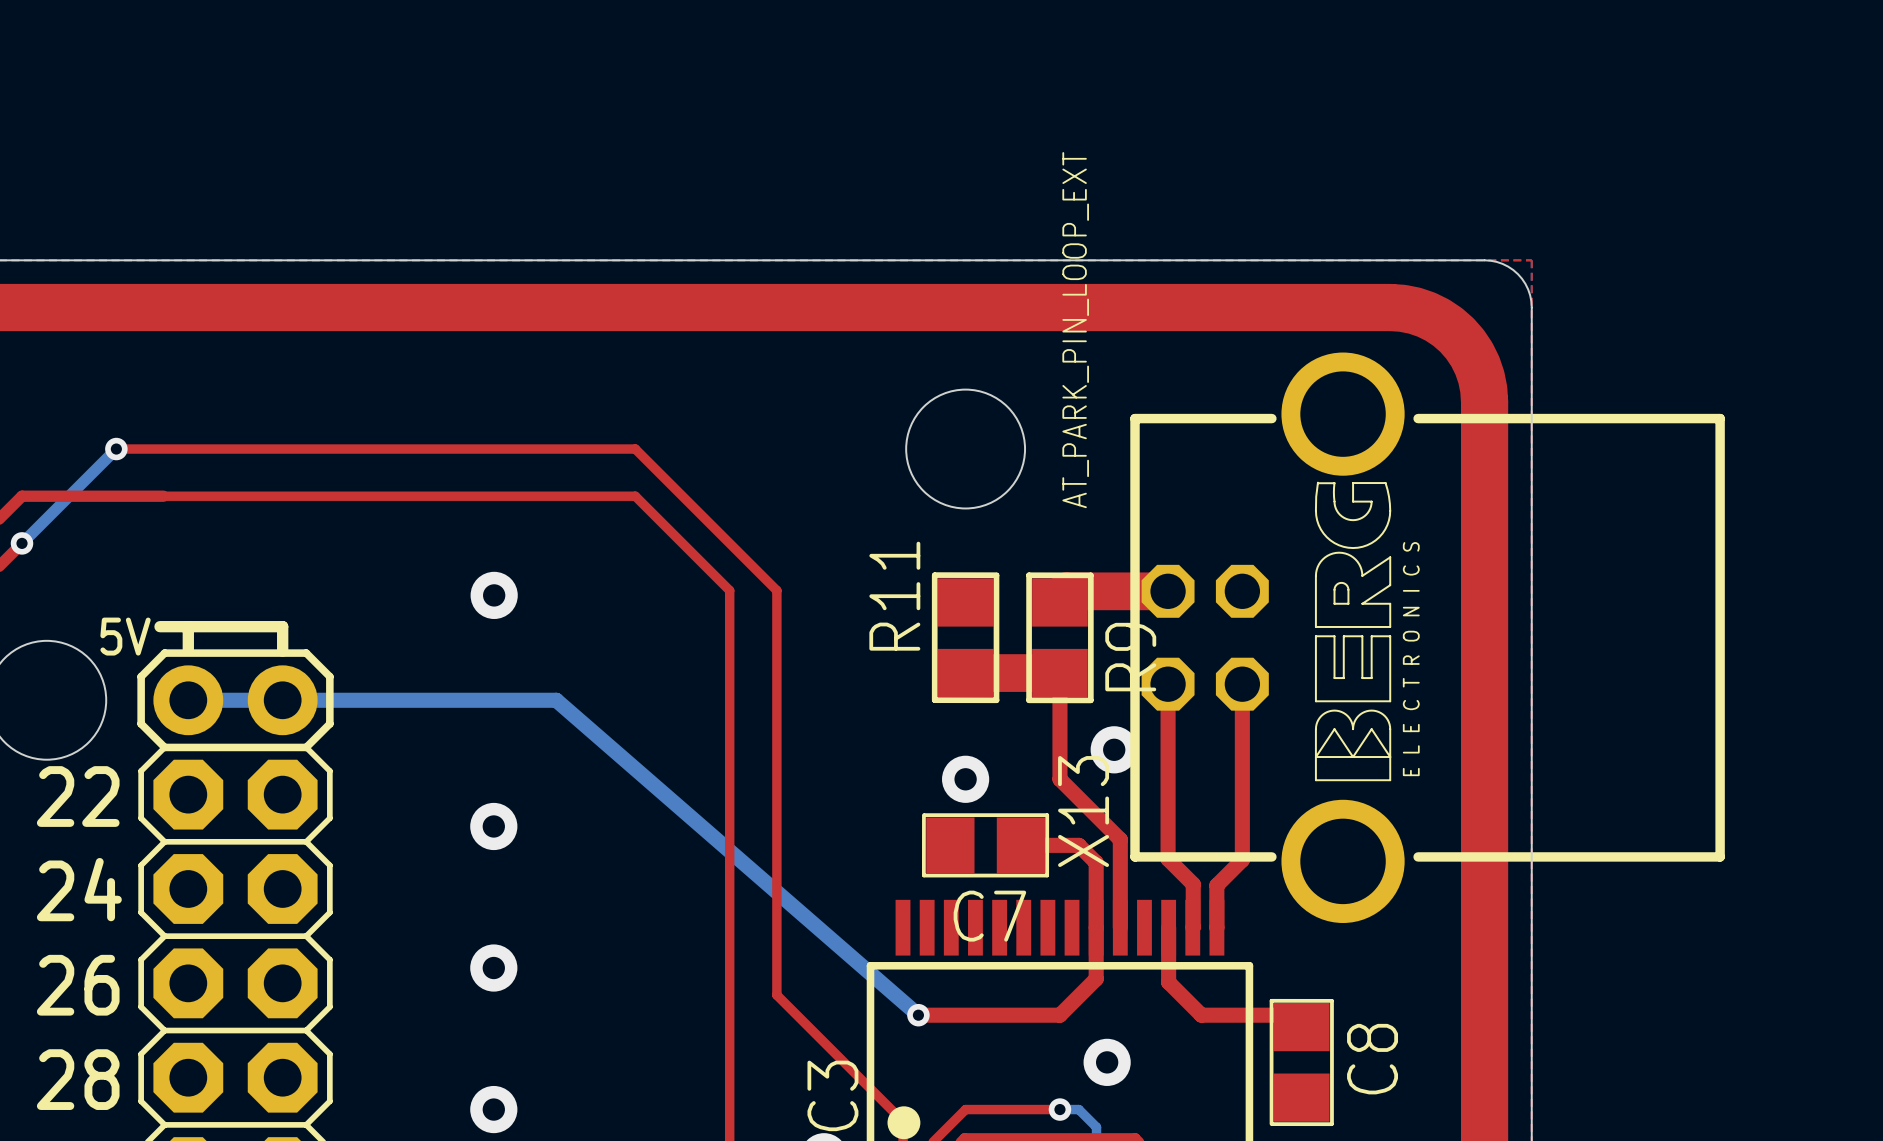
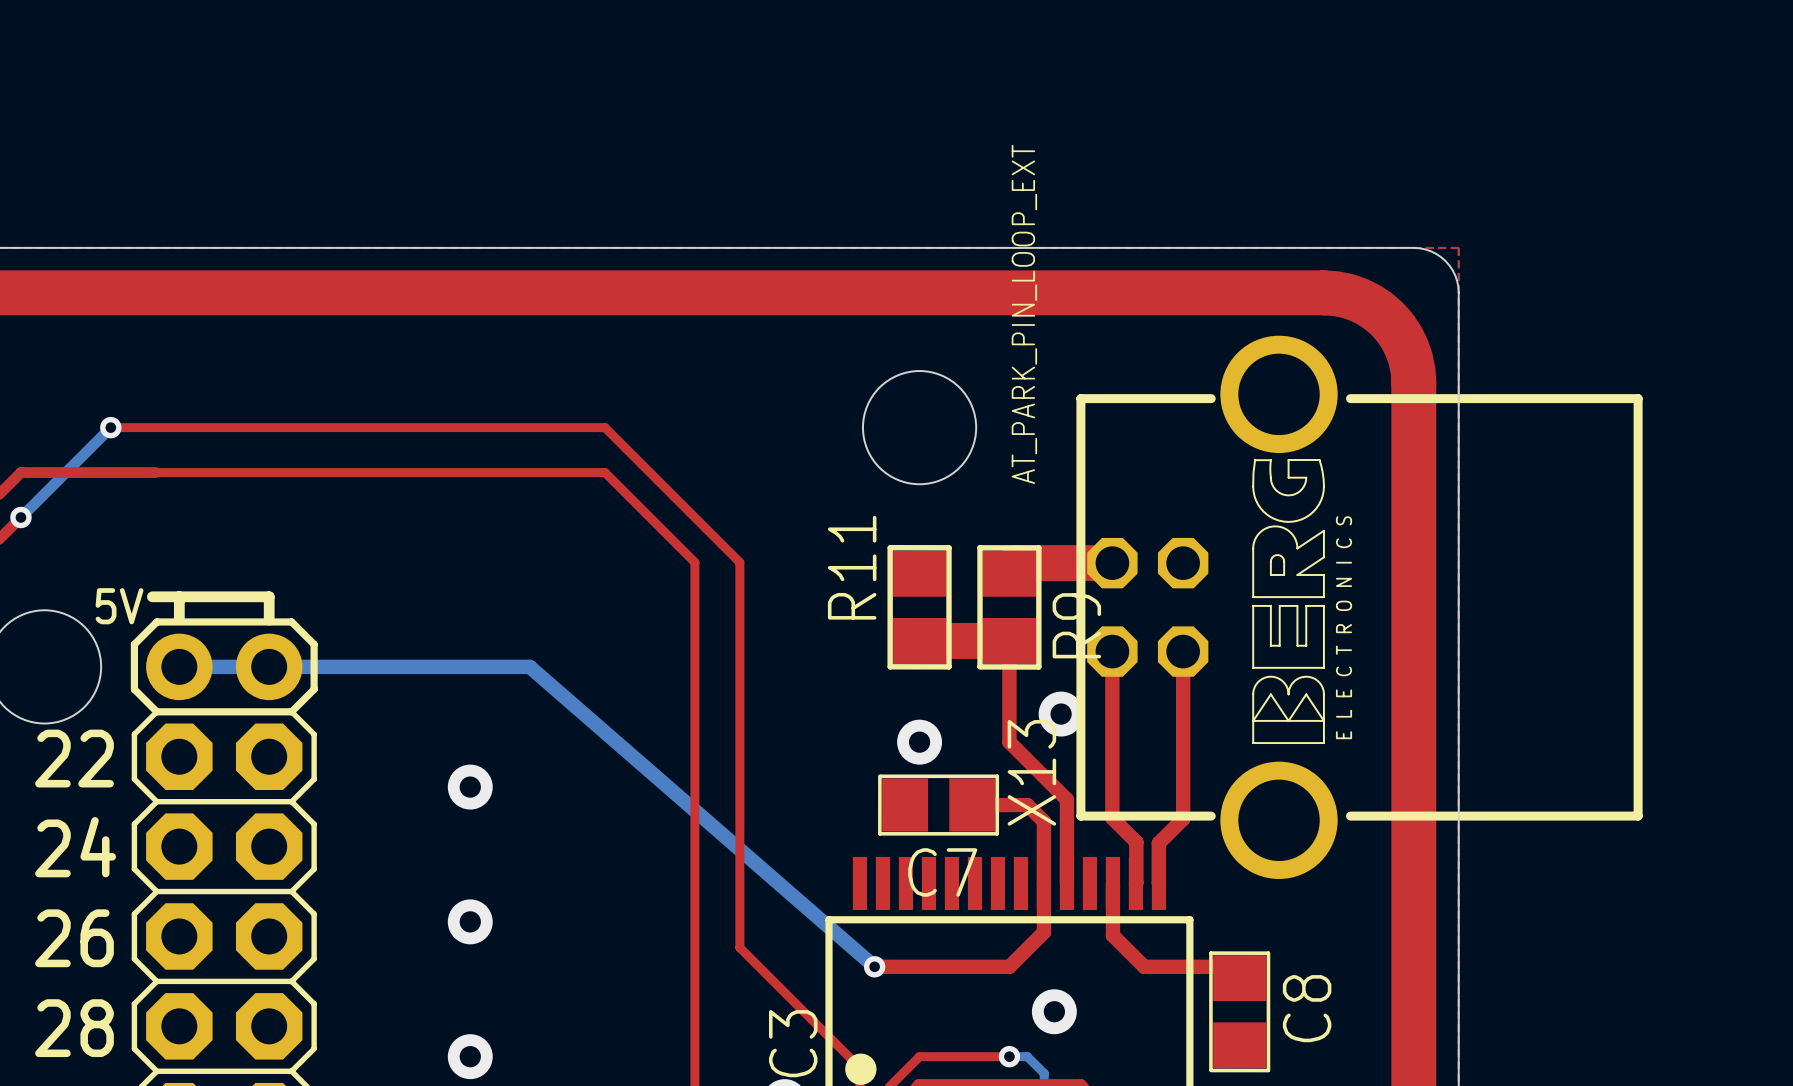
via: (494, 595) -> none

